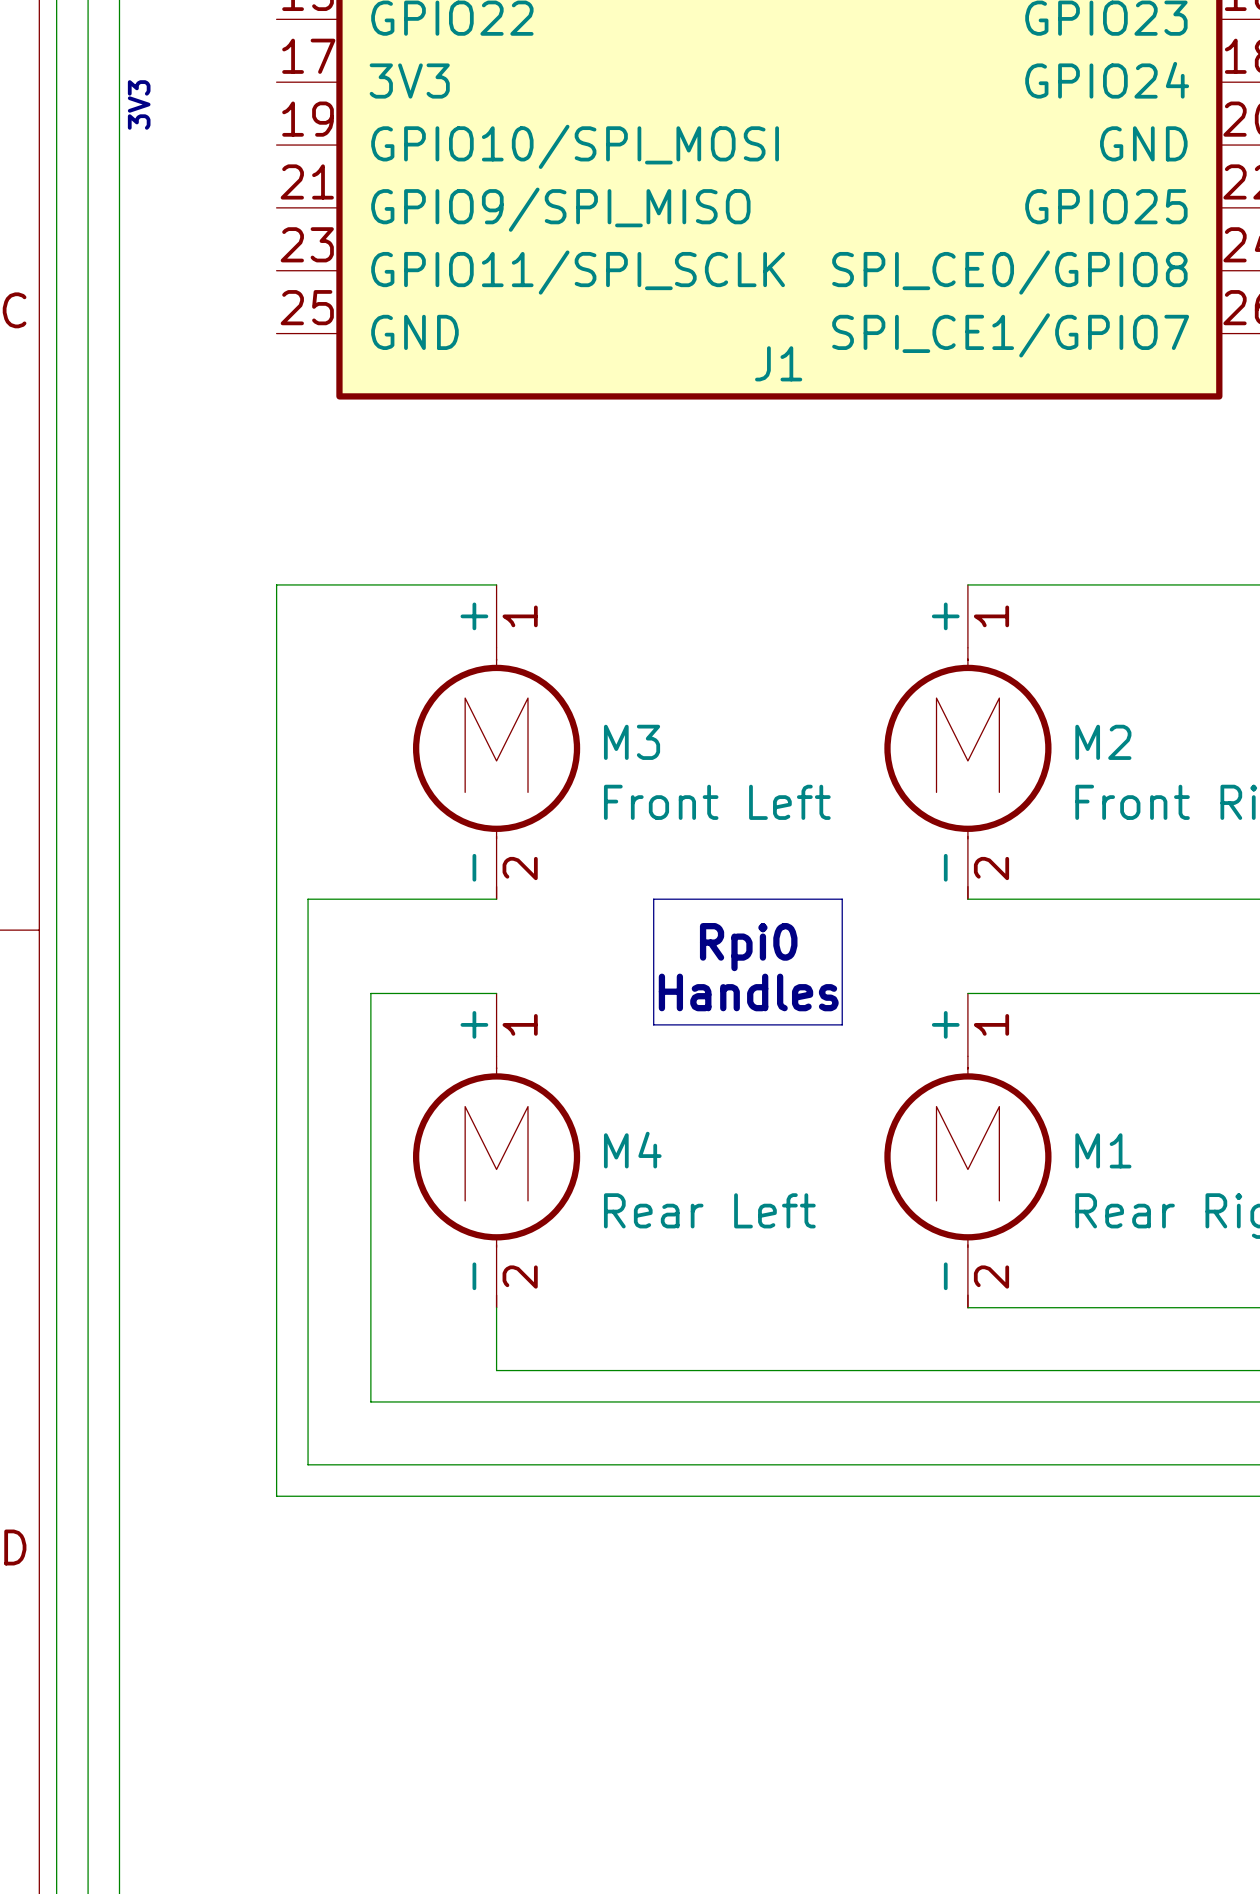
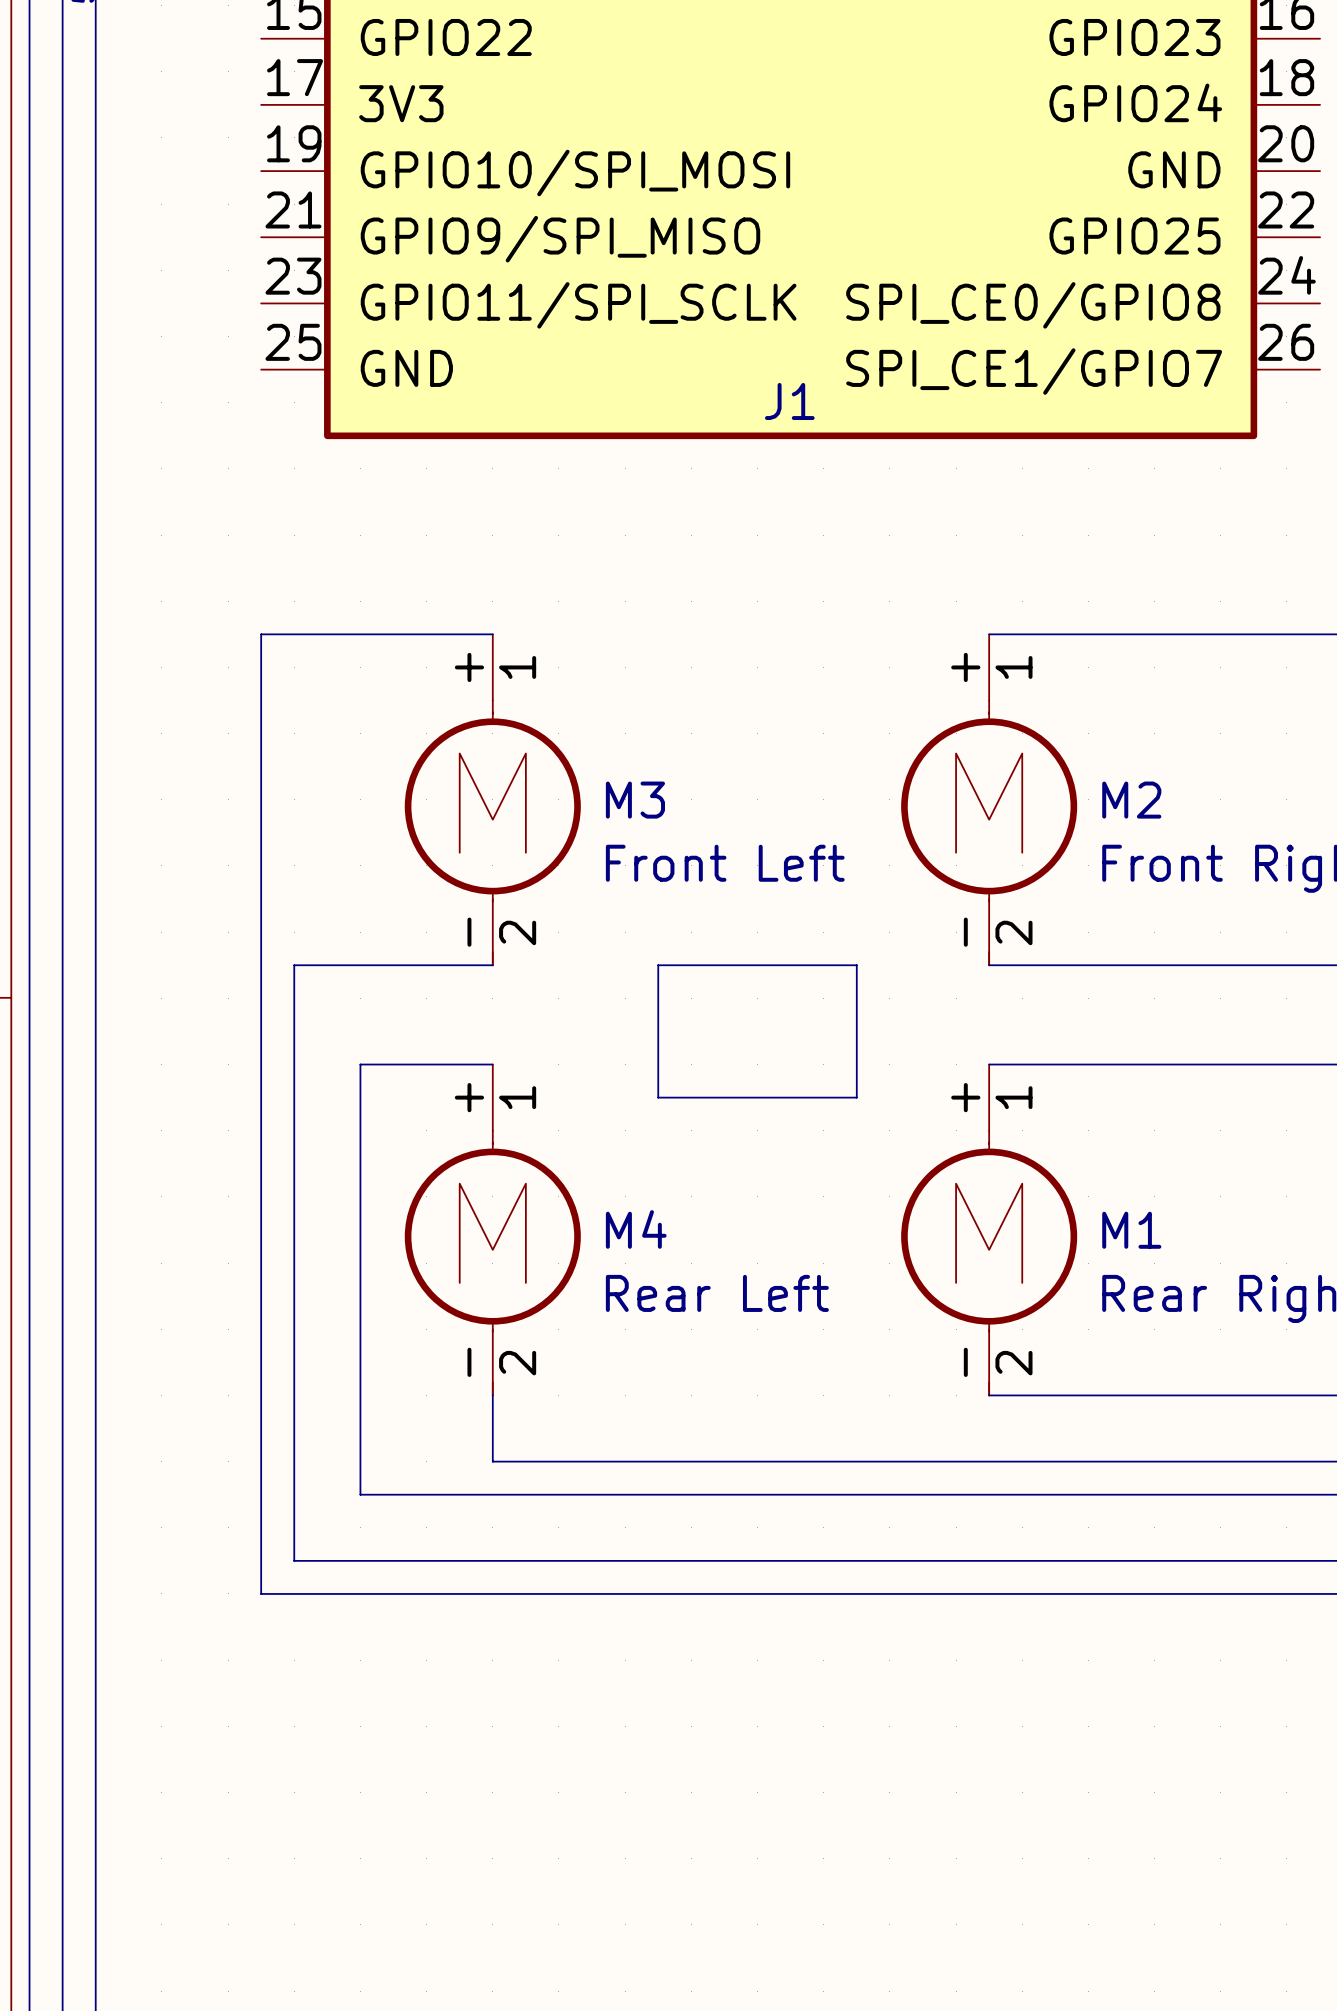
text: 3V3 (139, 104) -> none
text: Rpi0 (748, 947) -> none
text: Handles (748, 992) -> none

